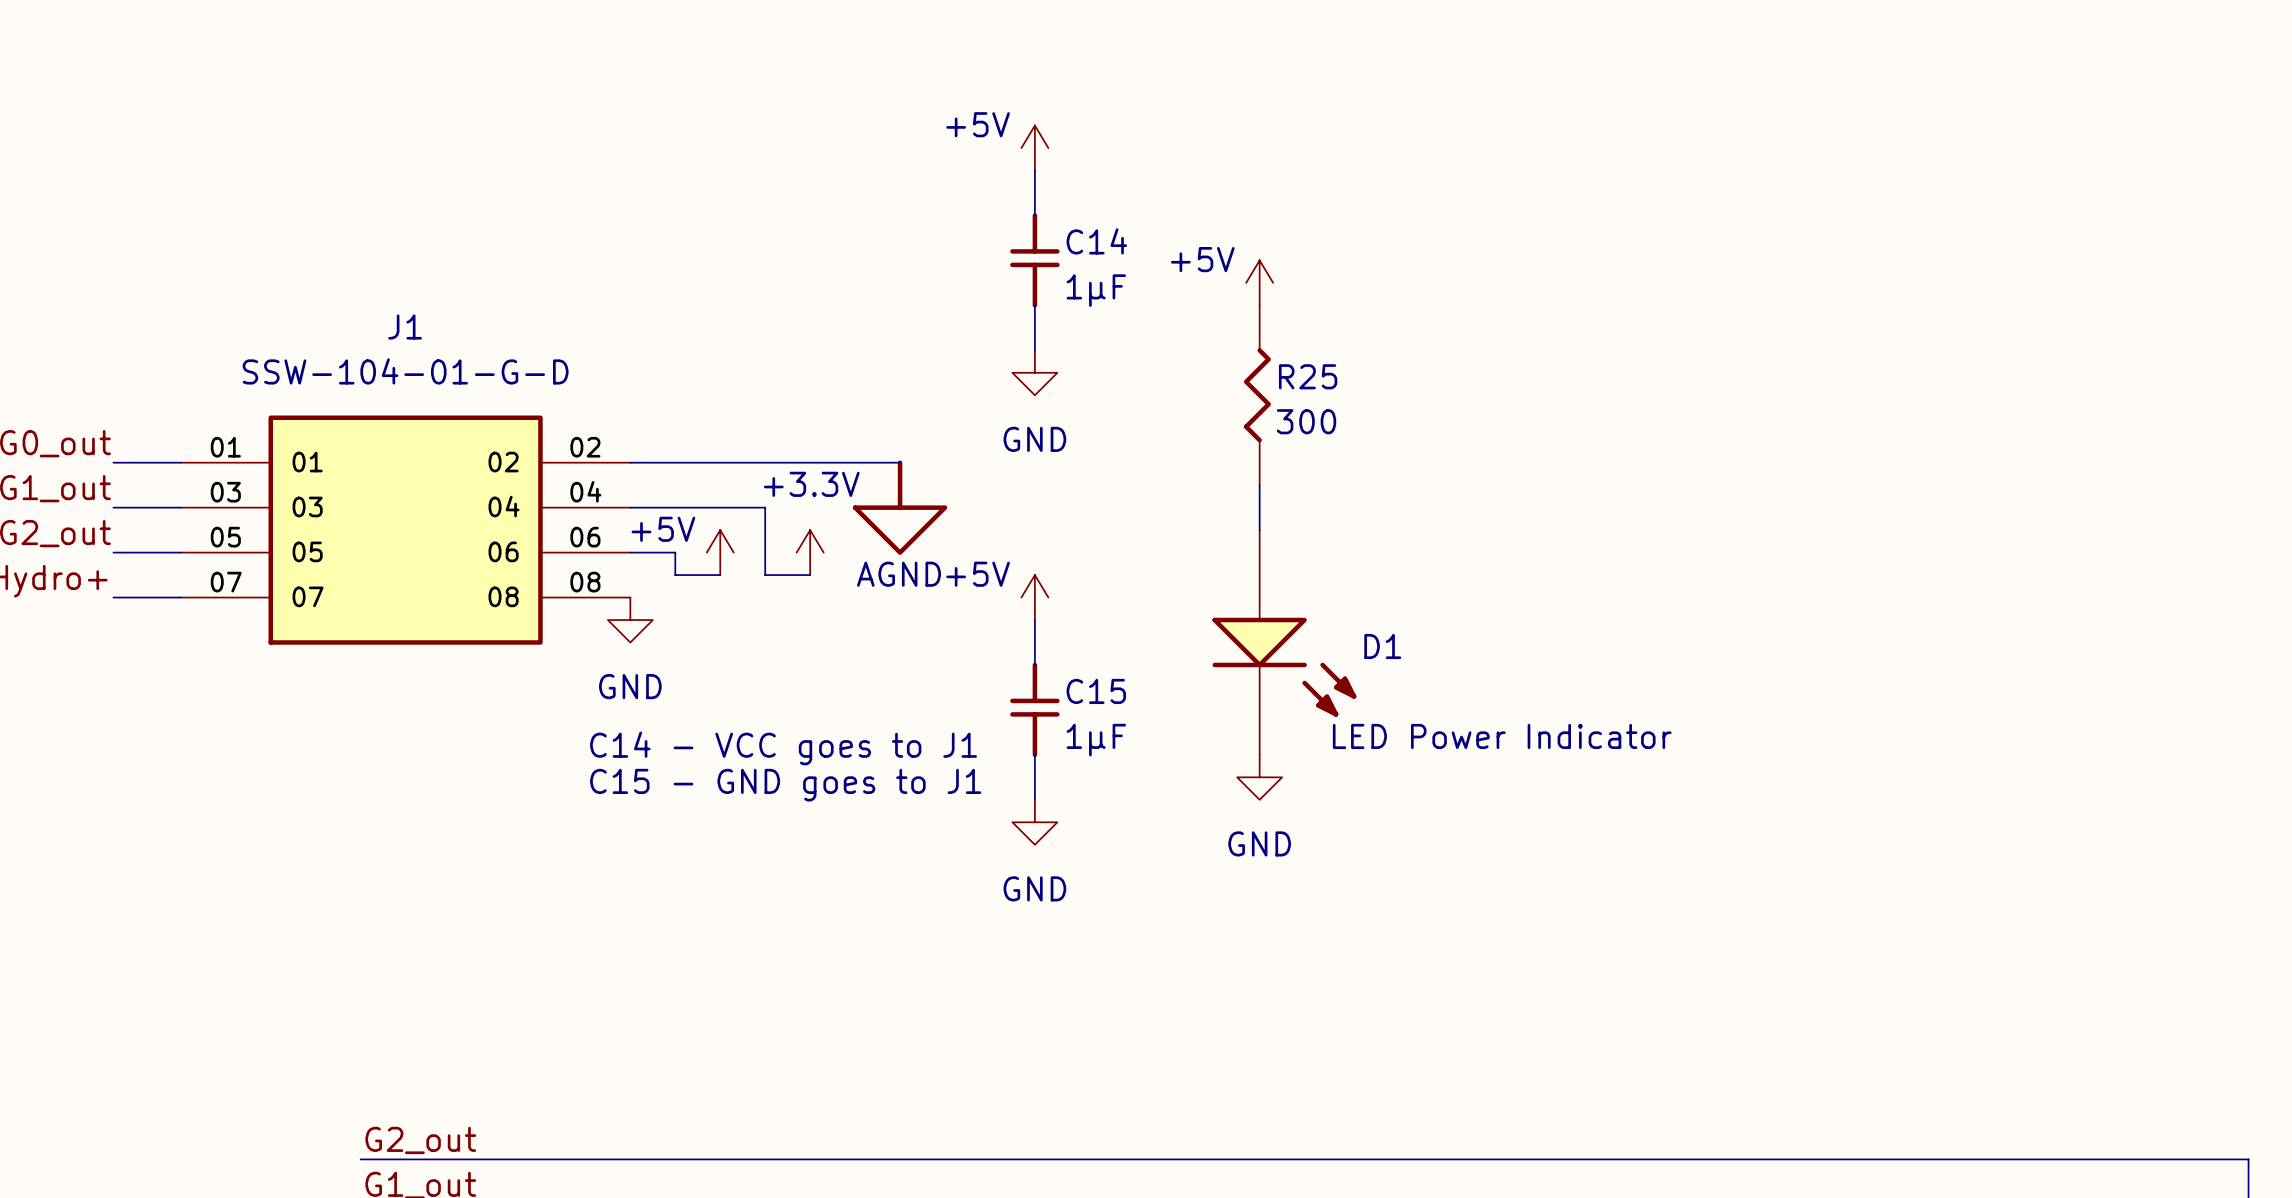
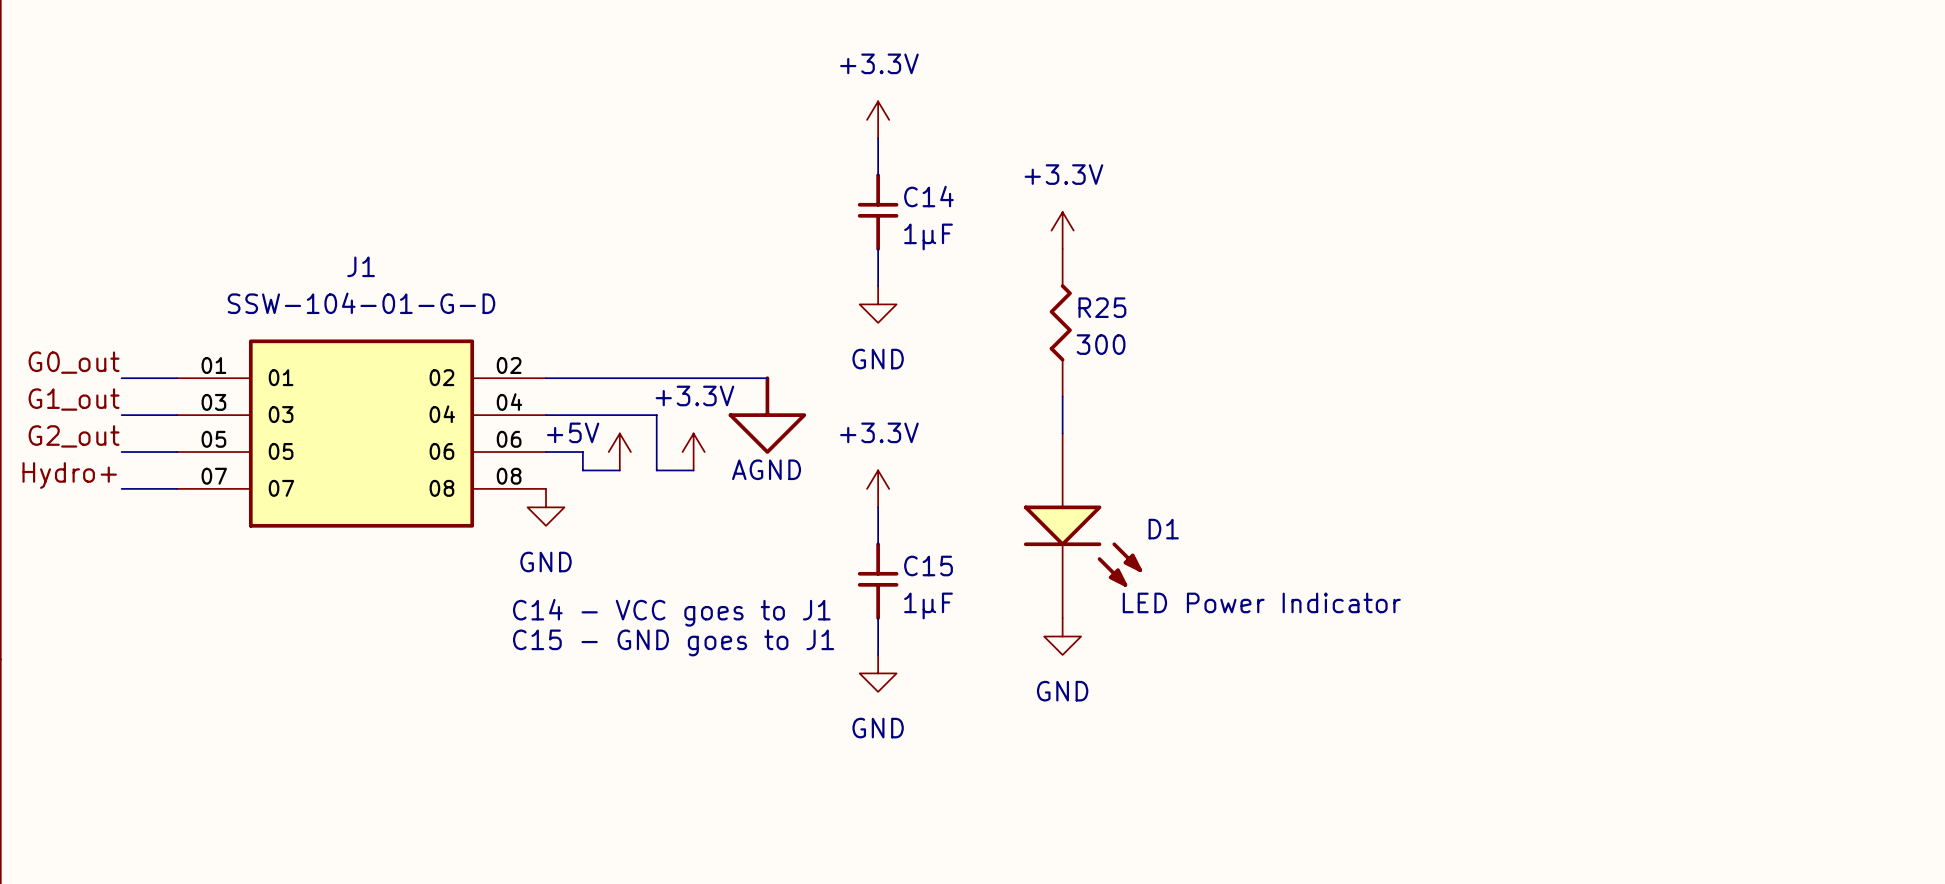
power symbol: +5V (1034, 148) -> +3.3V (878, 119)
power symbol: +5V (1259, 282) -> +3.3V (1062, 230)
power symbol: +5V (1034, 597) -> +3.3V (878, 488)

